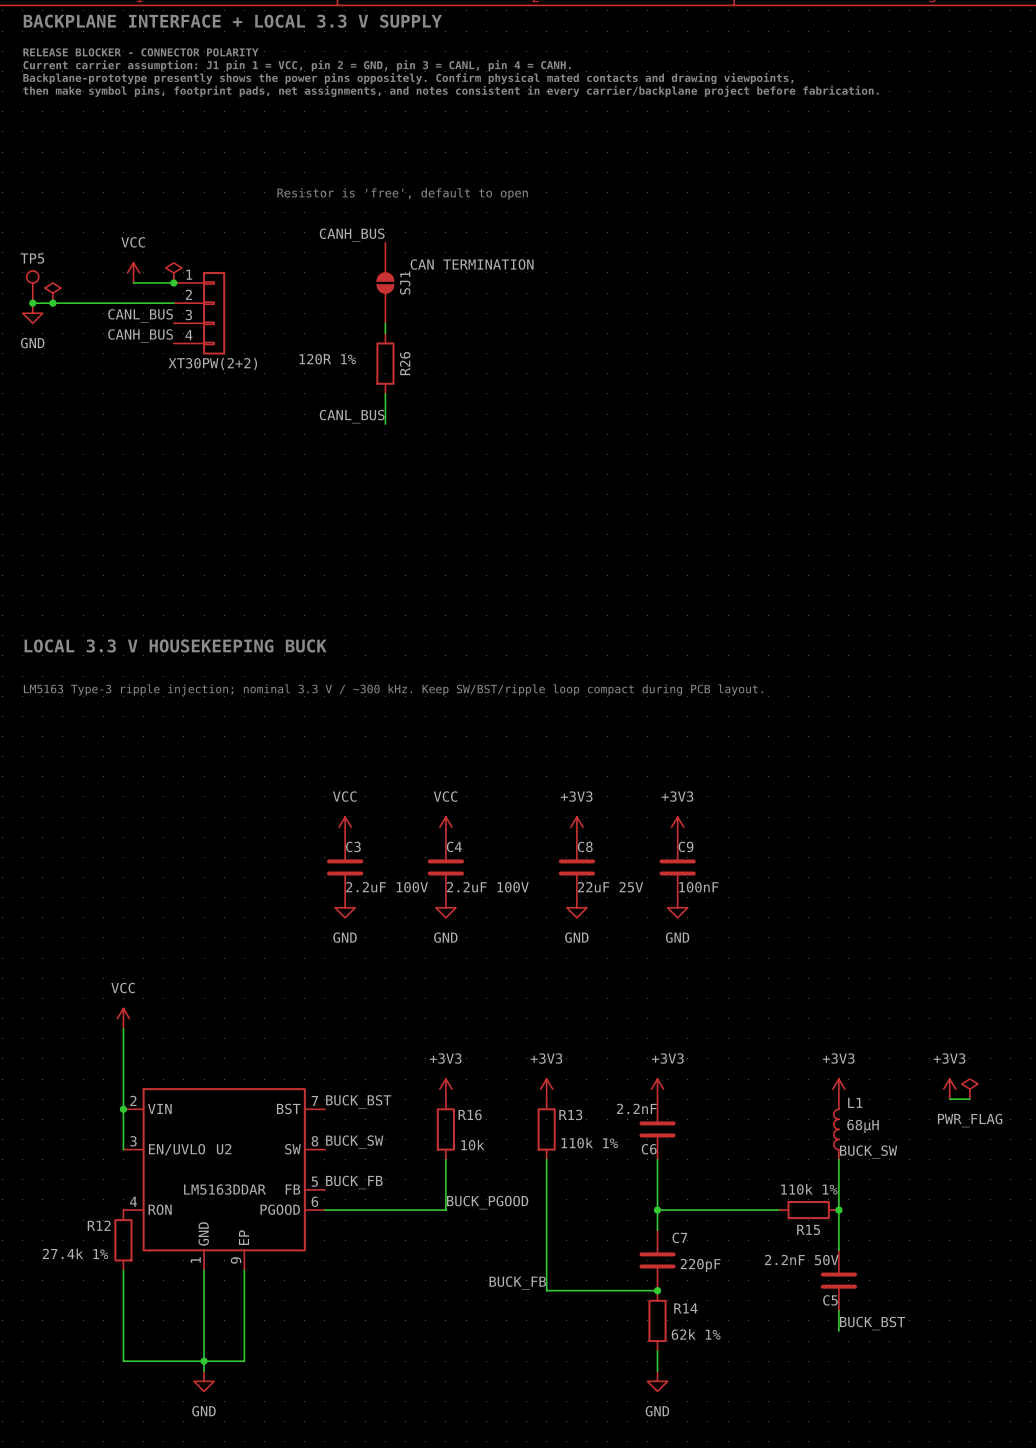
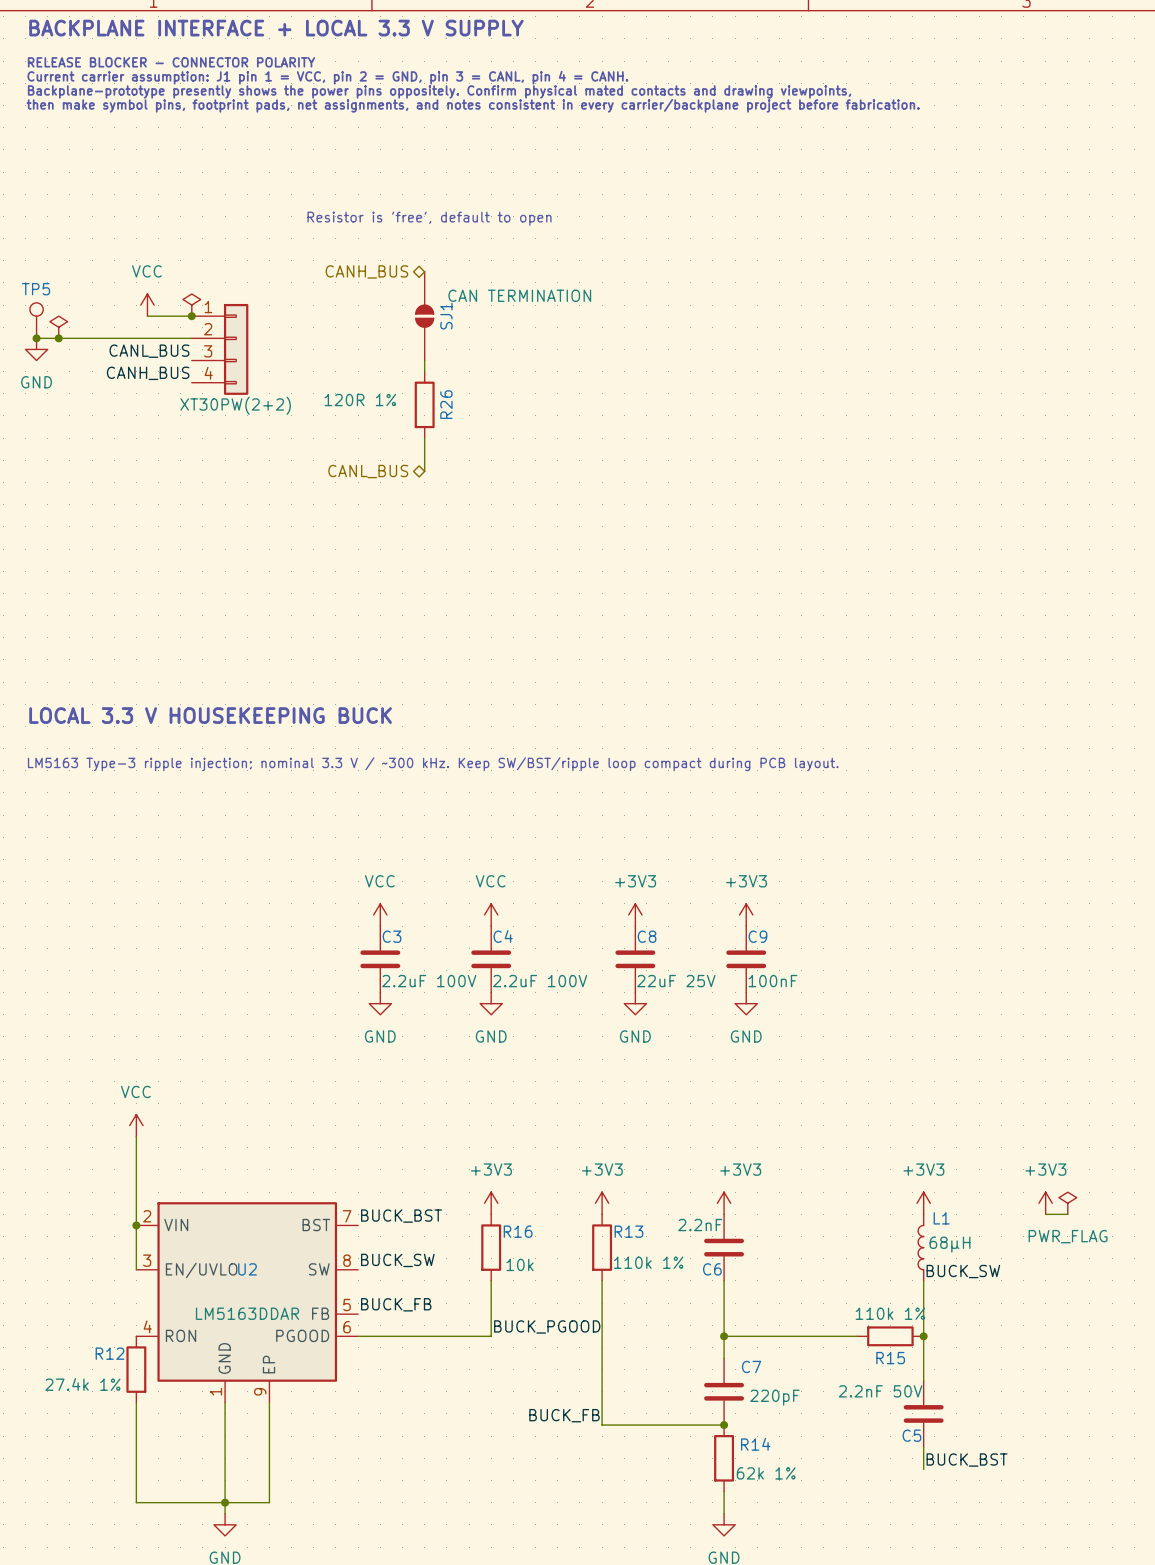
label: CANH_BUS (352, 235) -> none
hierarchical label: none -> CANH_BUS (366, 271)
label: CANL_BUS (352, 416) -> none
hierarchical label: none -> CANL_BUS (368, 471)

